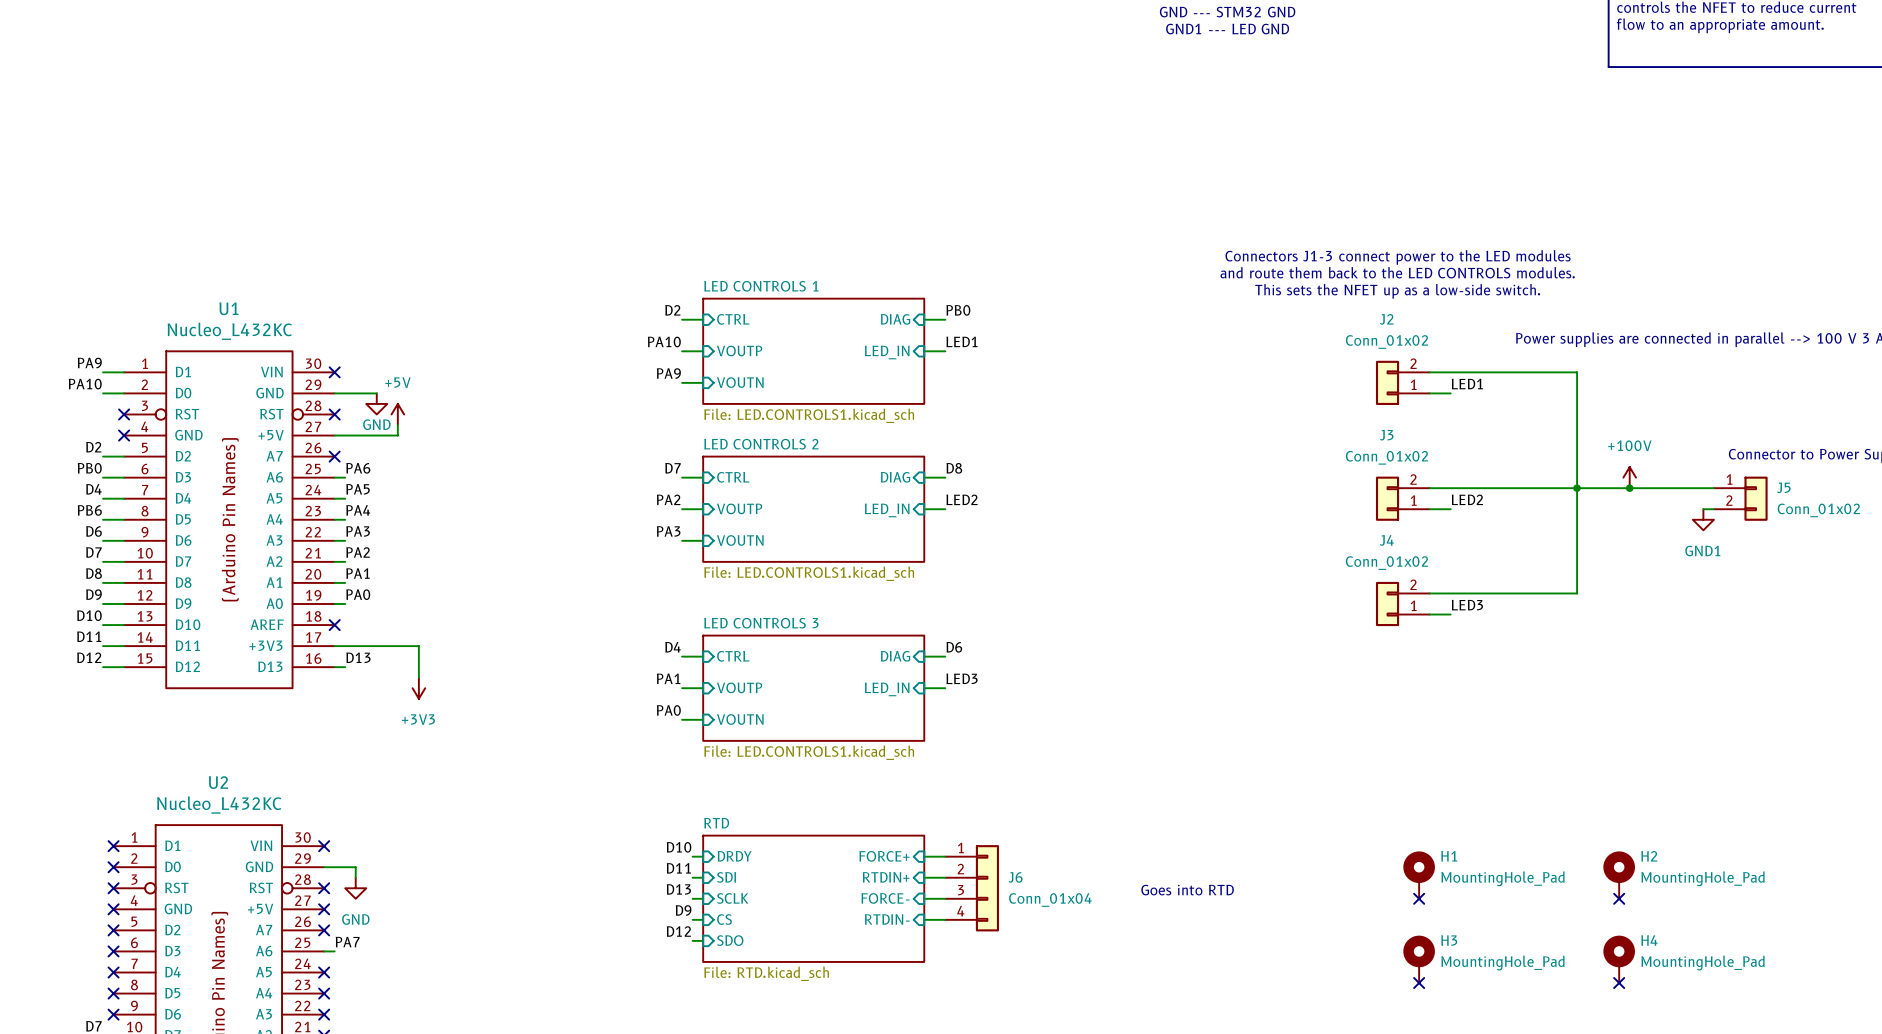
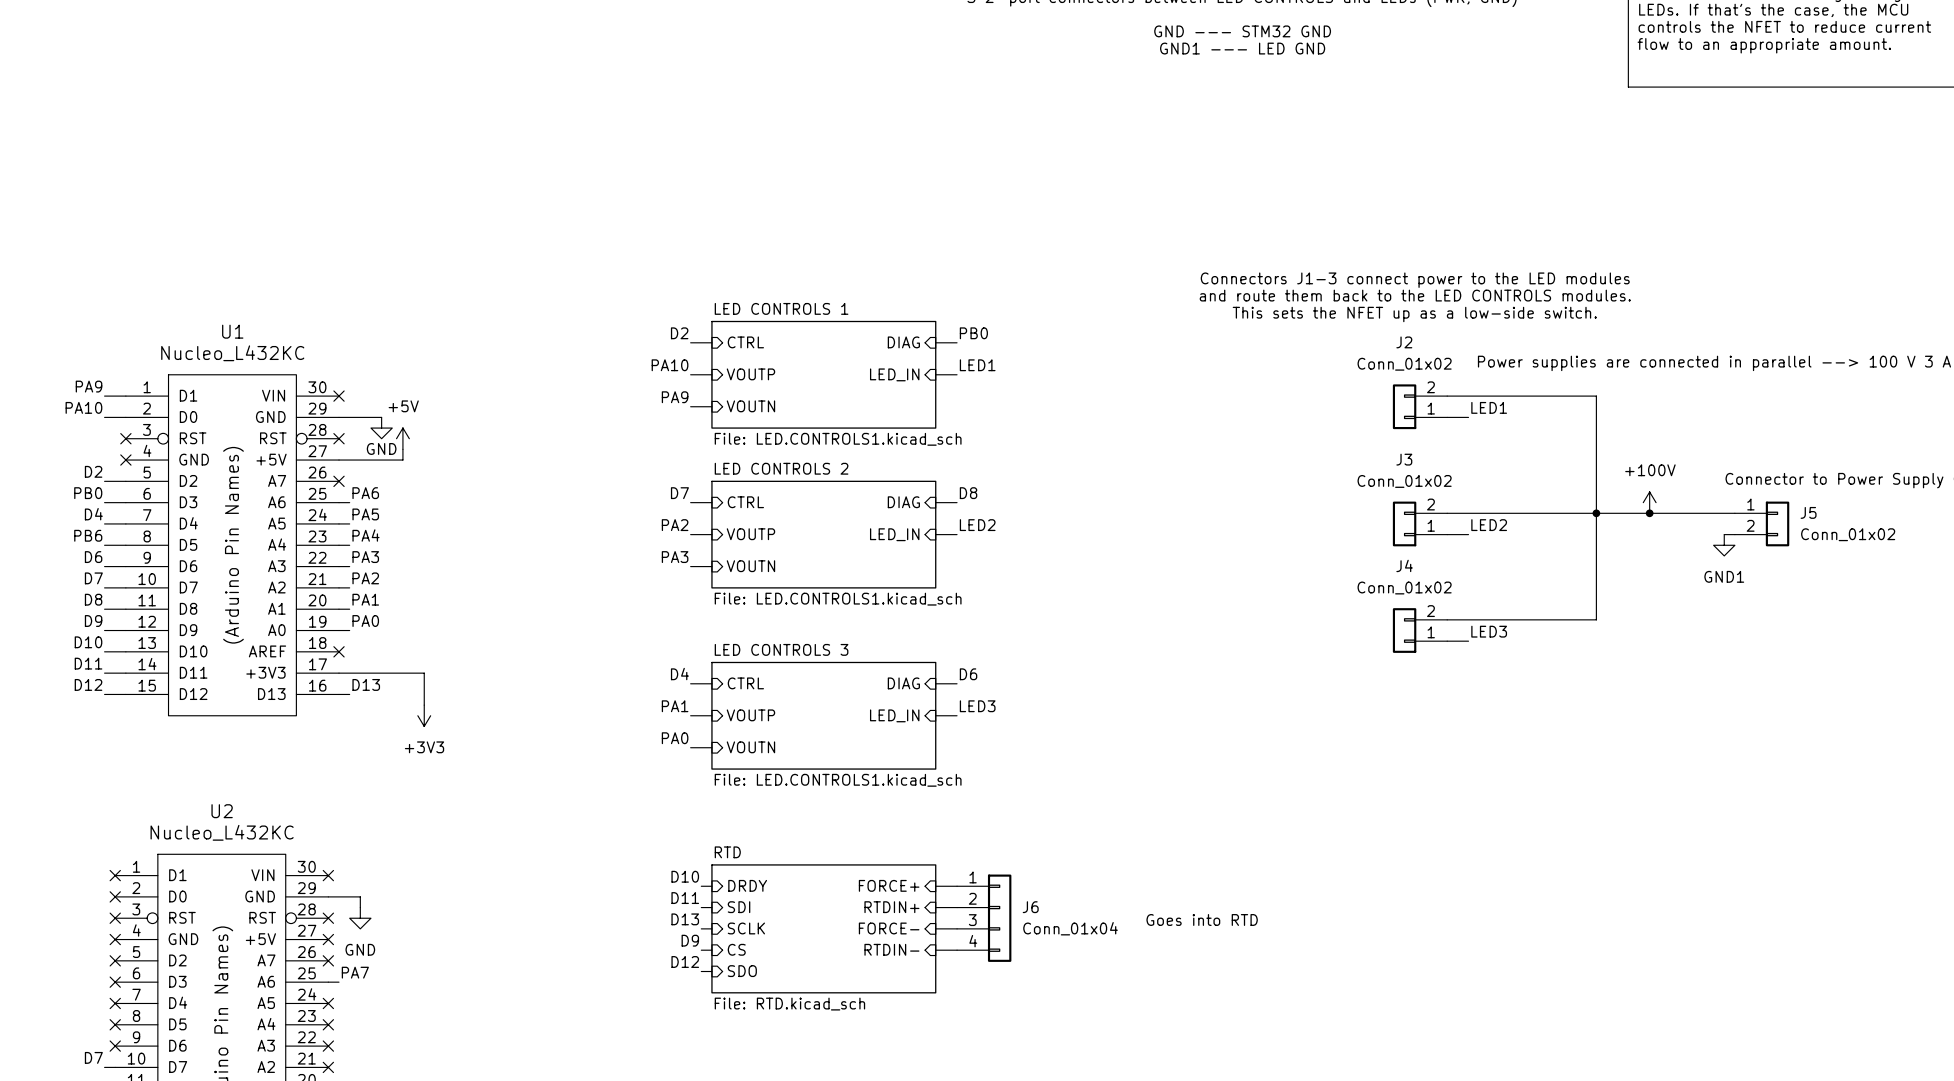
H1: MountingHole_Pad (1419, 875) -> none
H2: MountingHole_Pad (1619, 875) -> none
no-connect mark: (1419, 898) -> none
no-connect mark: (1619, 898) -> none
H3: MountingHole_Pad (1419, 959) -> none
H4: MountingHole_Pad (1619, 959) -> none
no-connect mark: (1419, 983) -> none
no-connect mark: (1619, 983) -> none

